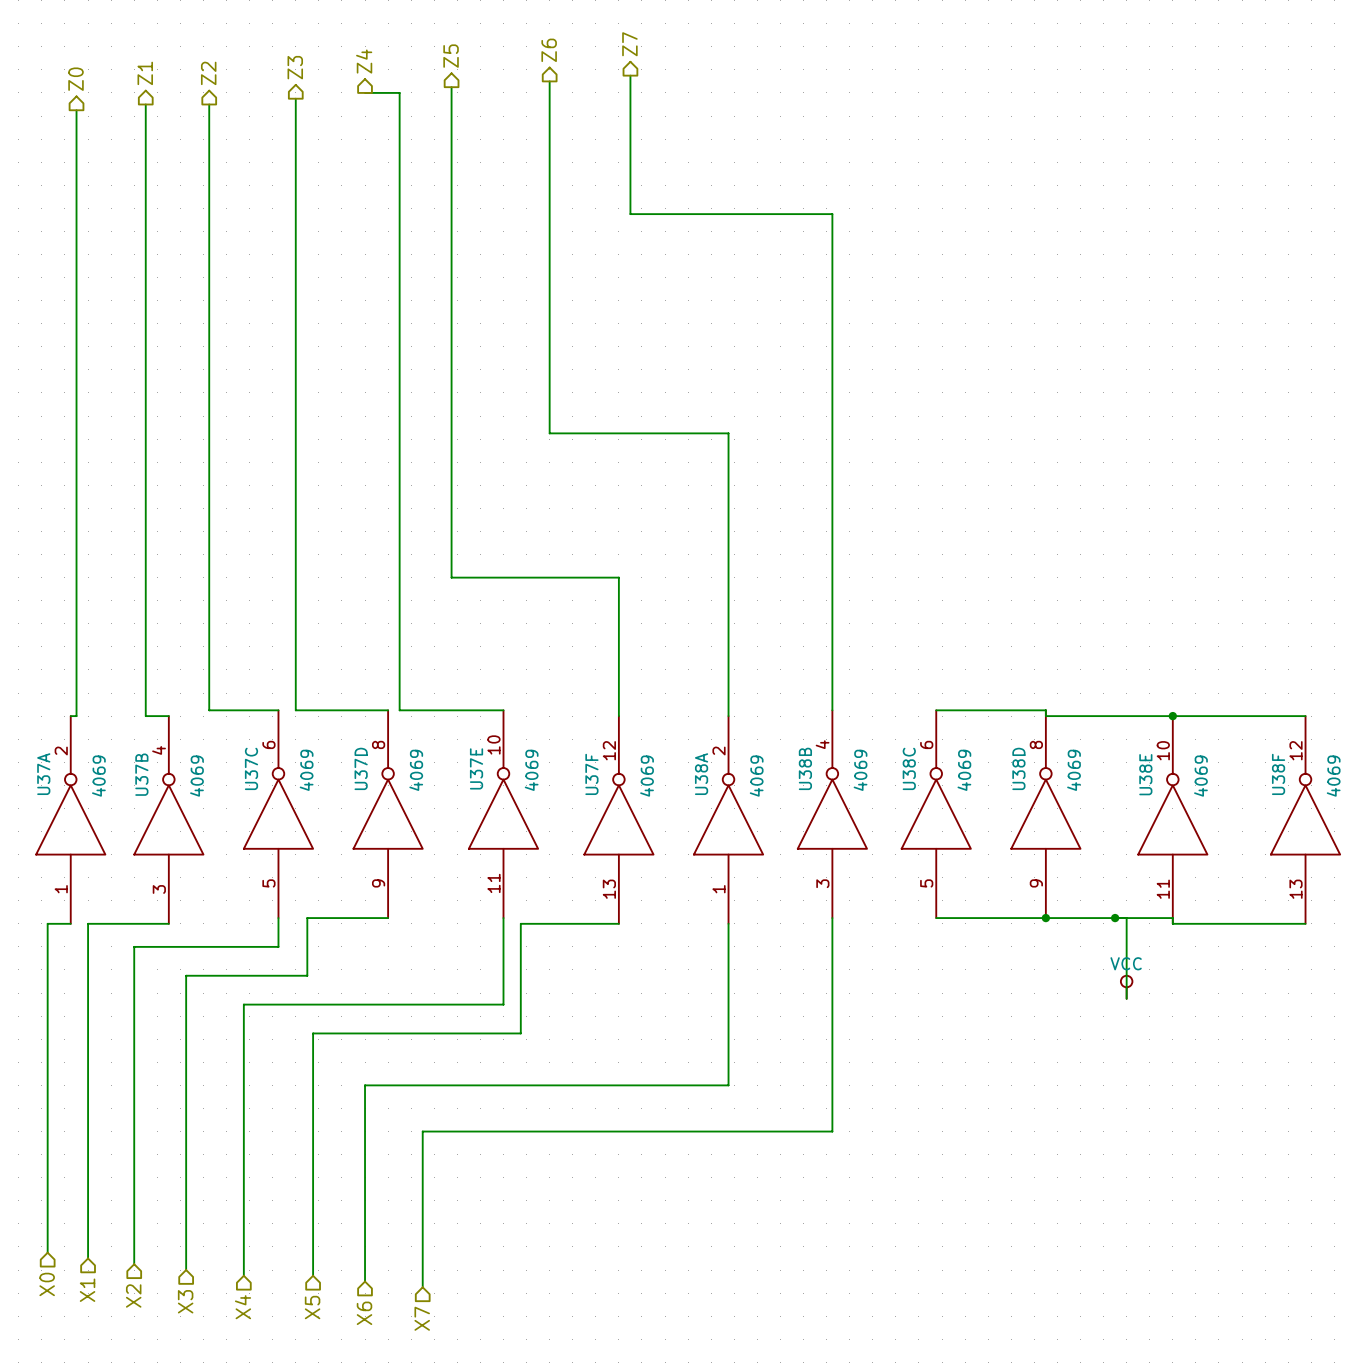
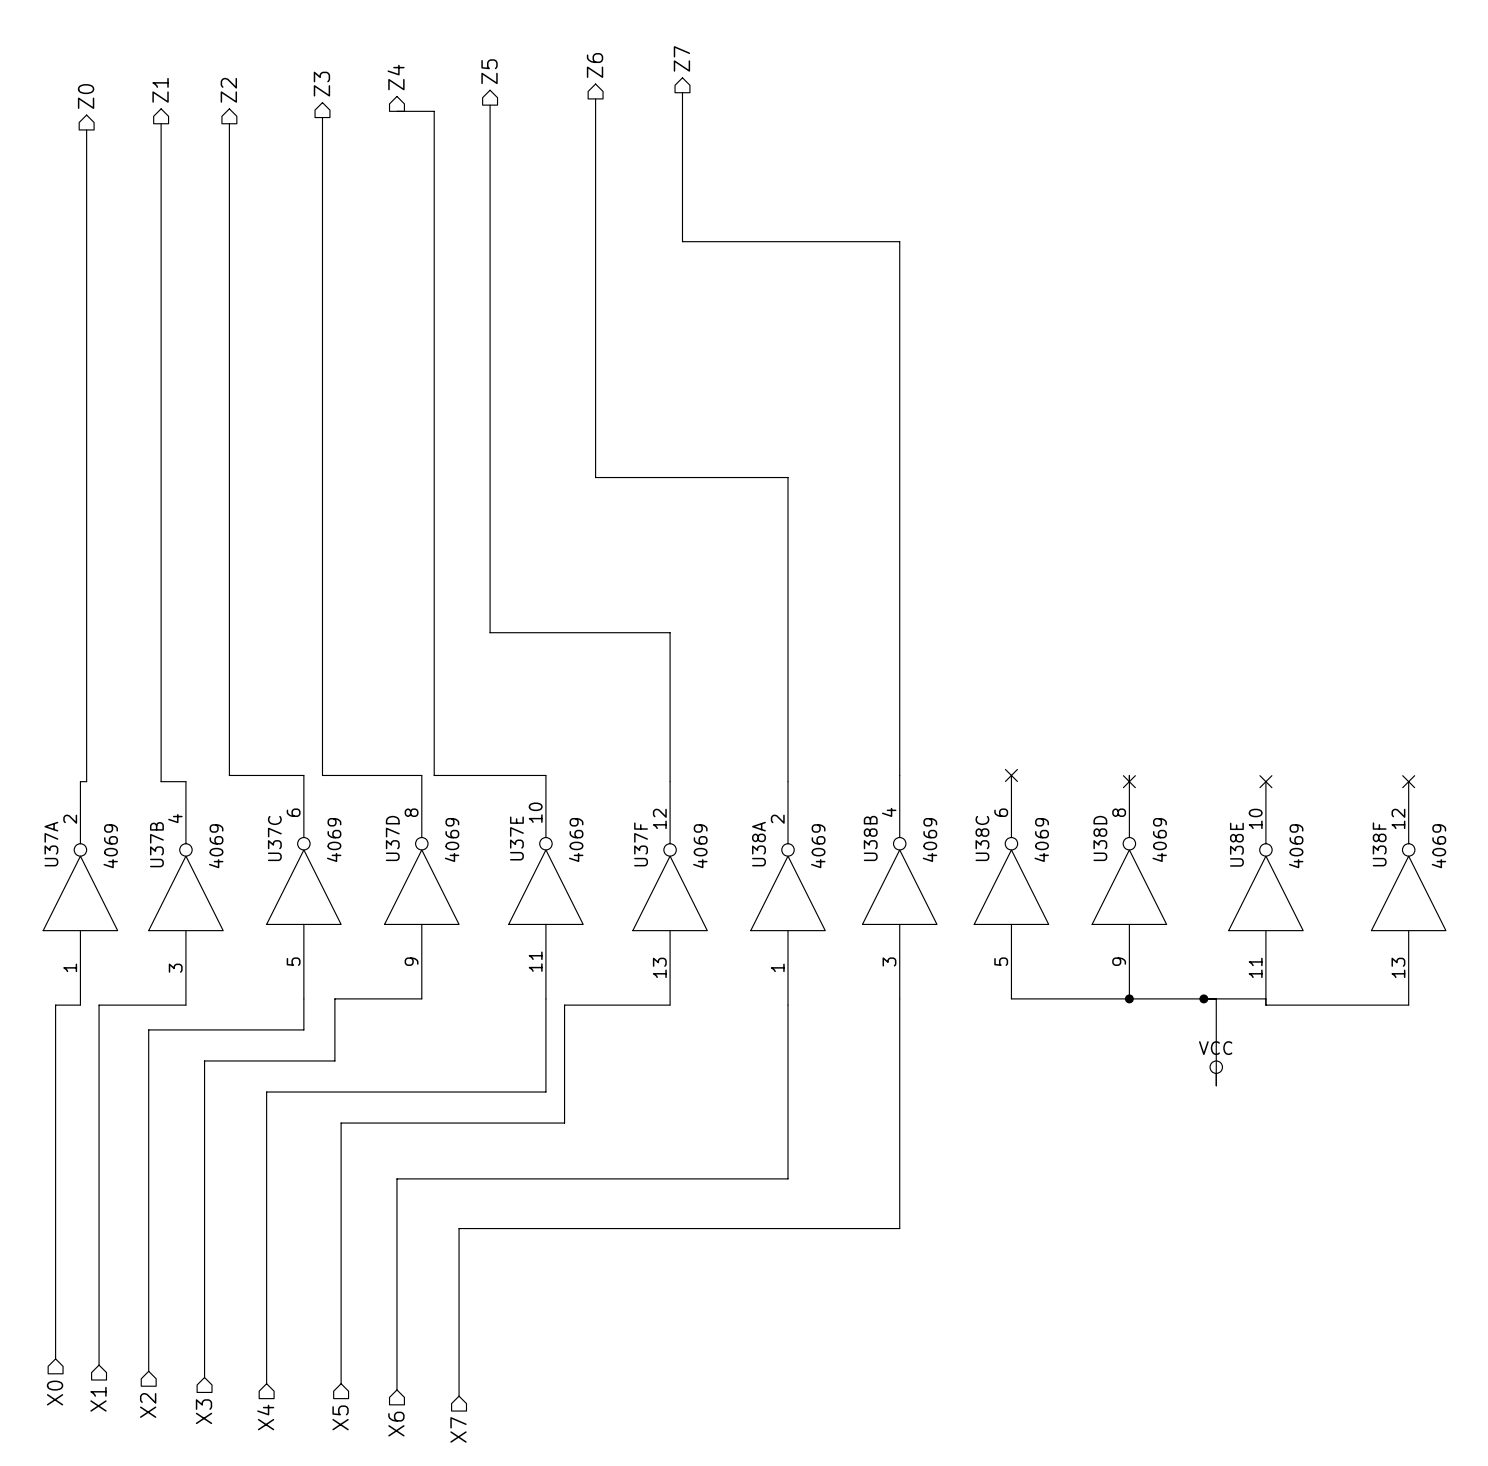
wire: (936, 710) (1045, 710) -> none
no-connect mark: none -> (1011, 775)
wire: (1045, 716) (1305, 716) -> none
no-connect mark: none -> (1129, 781)
junction: (1172, 716) -> none
no-connect mark: none -> (1265, 781)
no-connect mark: none -> (1408, 781)

